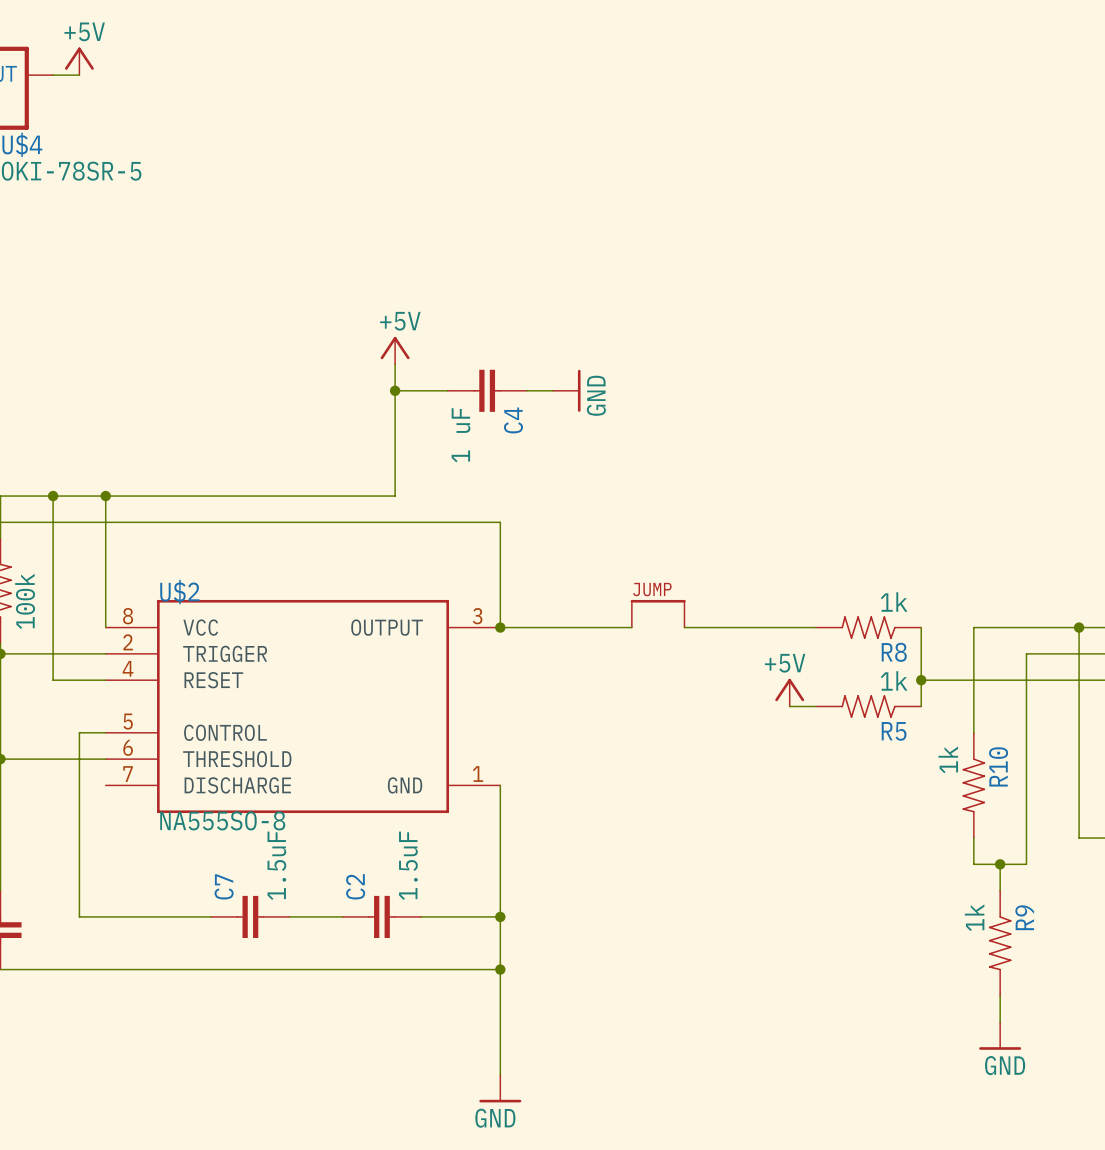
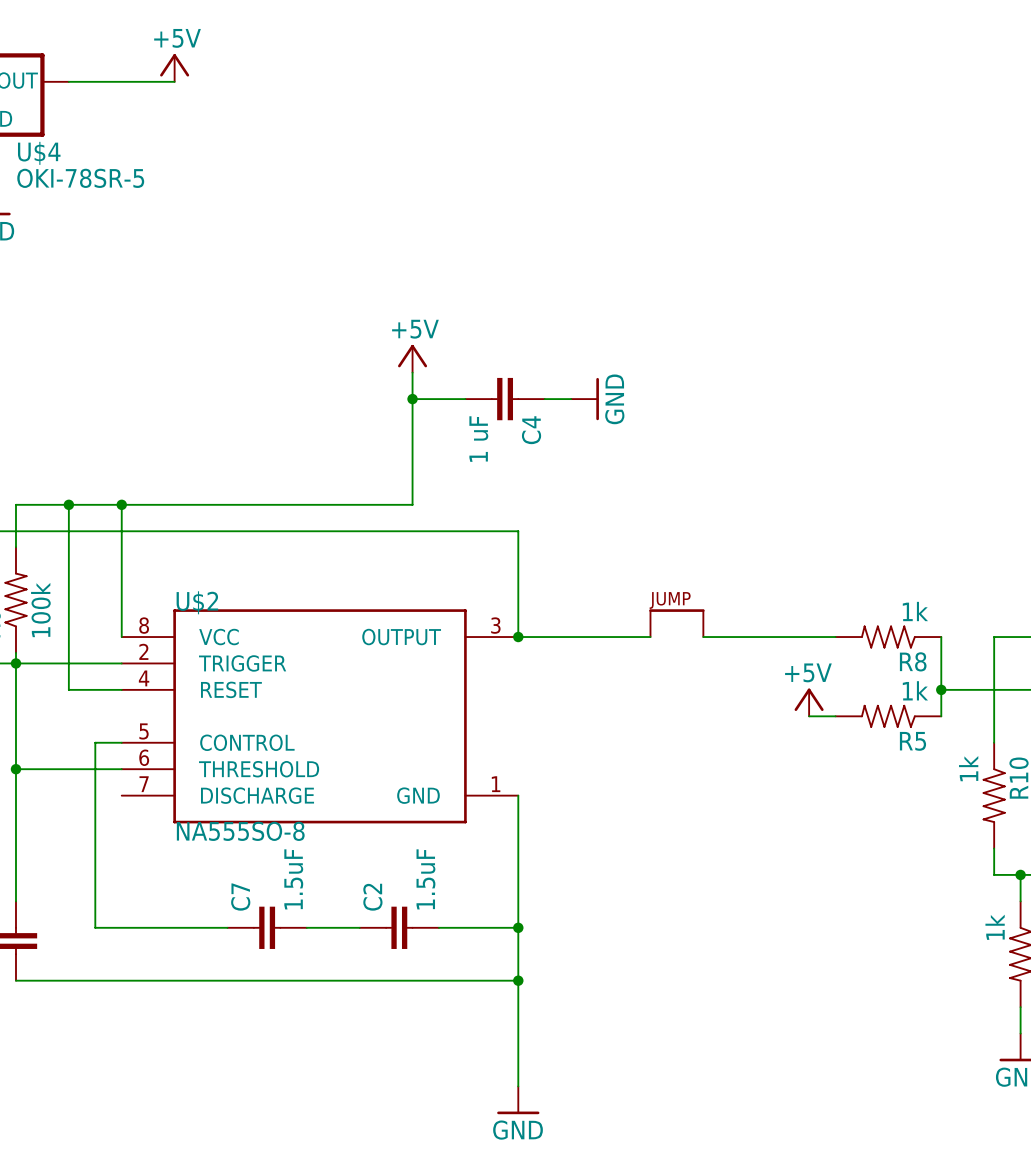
power symbol position: +5V (79, 61) -> +5V (174, 67)
wire: none -> (95, 81) (174, 81)

